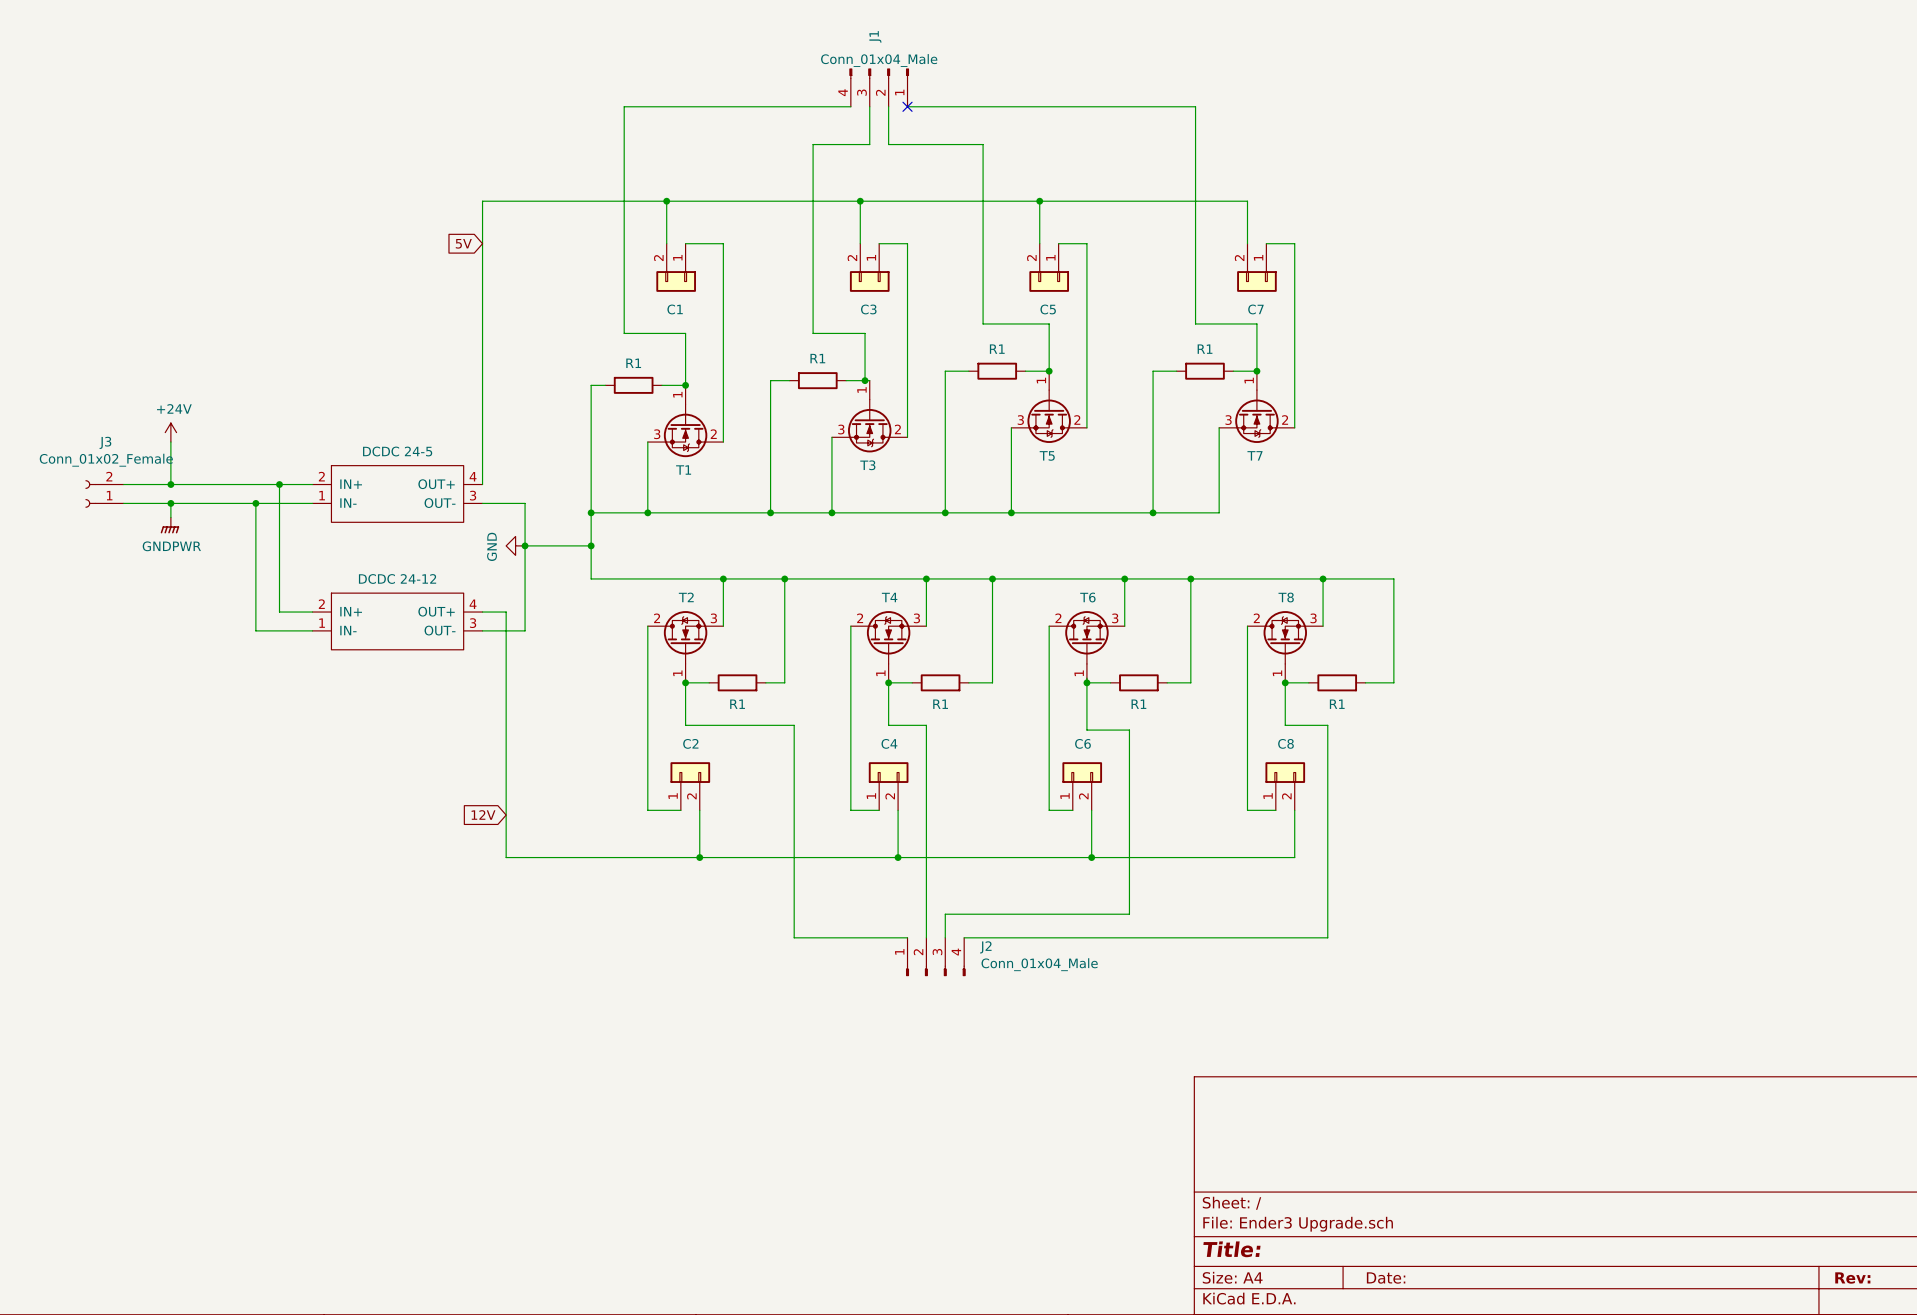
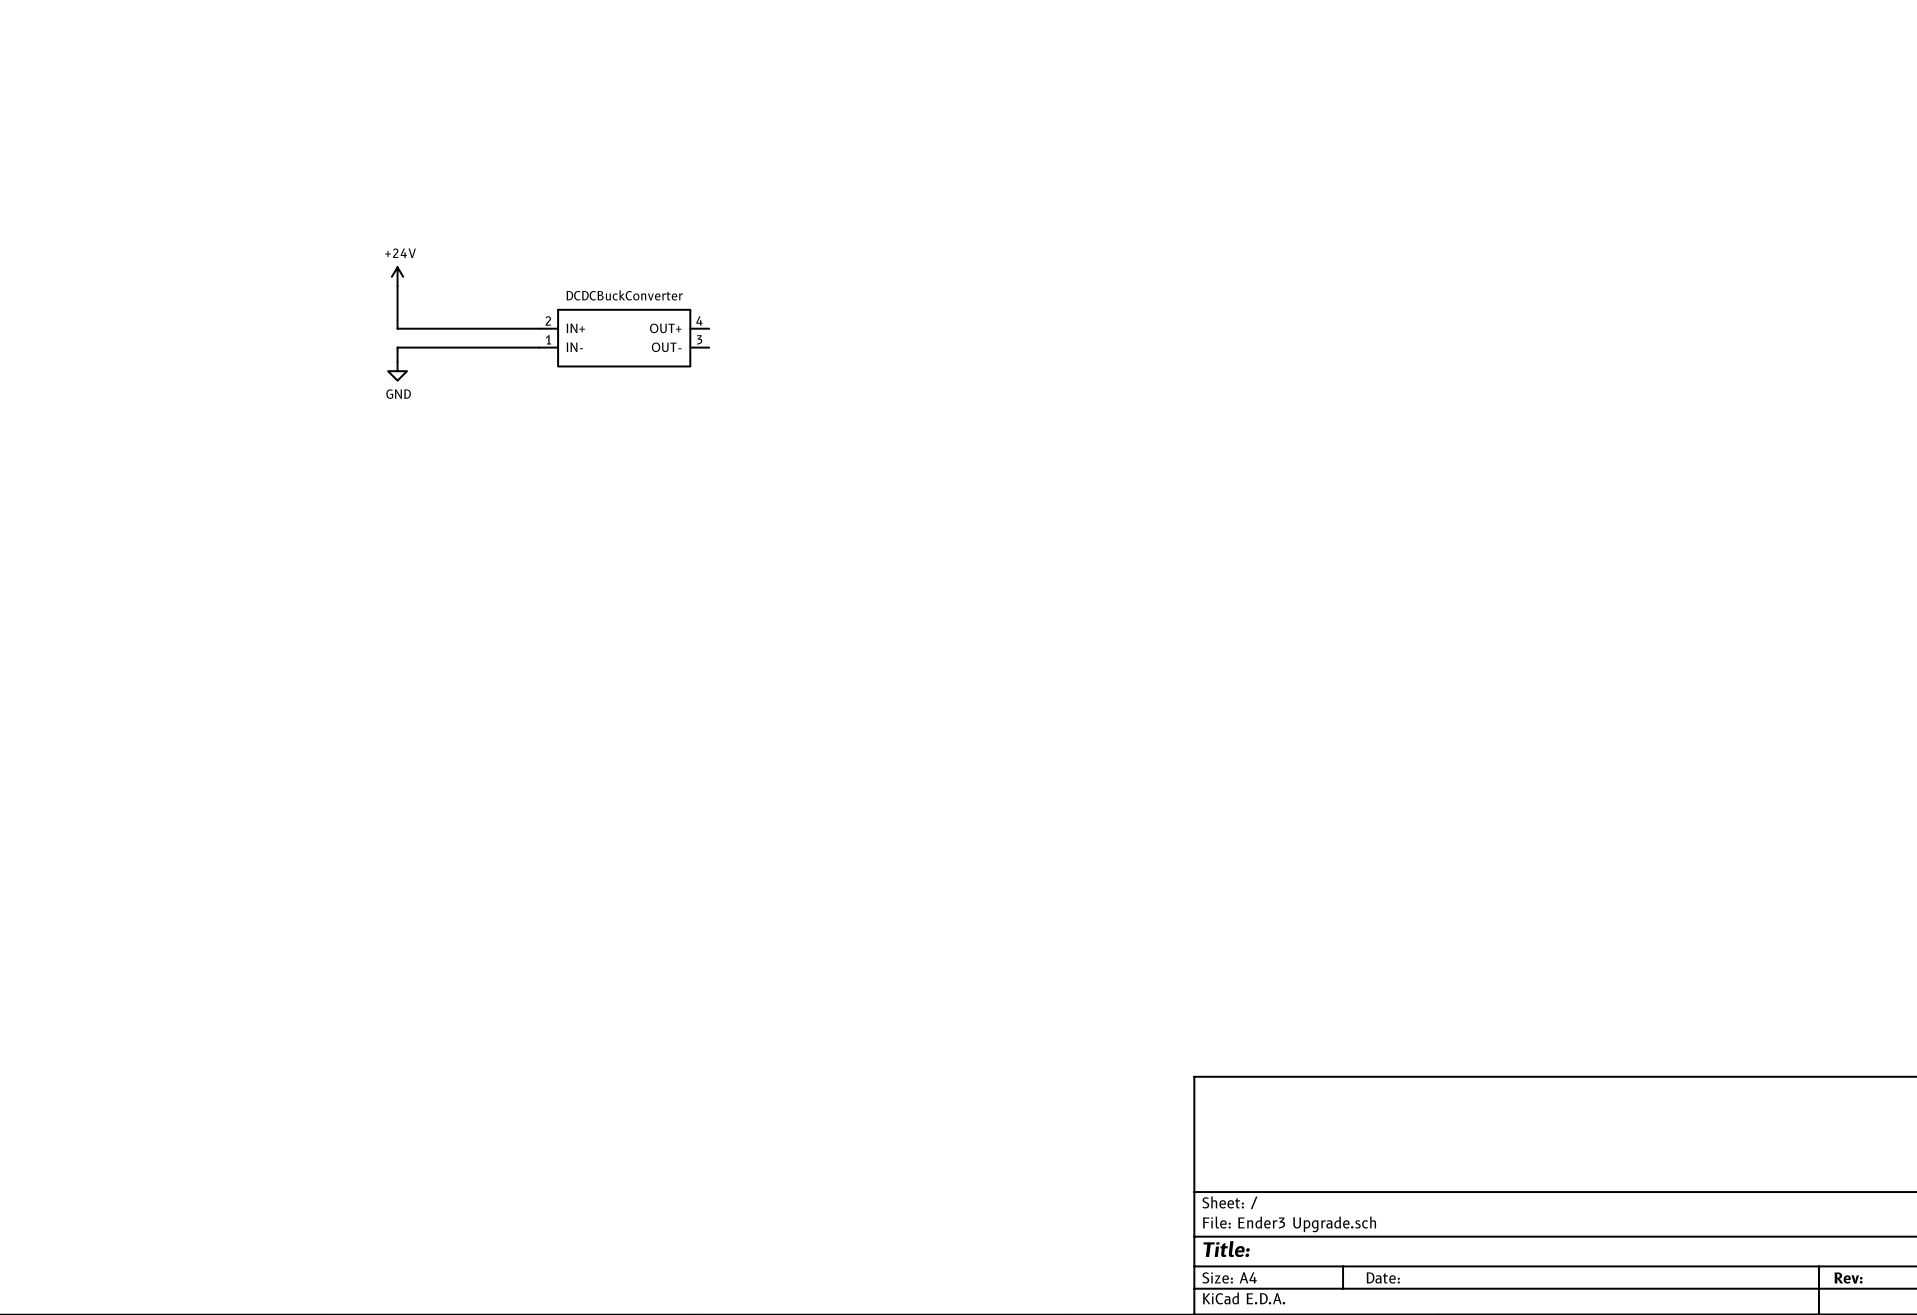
J1: Conn_01x04_Male (879, 87) -> none
wire: (850, 106) (624, 106) (624, 333) (685, 333) (685, 385) (661, 385) -> none
wire: (869, 106) (869, 144) (813, 144) (813, 333) (865, 333) (865, 380) -> none
wire: (888, 106) (888, 144) (983, 144) (983, 323) (1049, 323) (1049, 371) (1025, 371) -> none
wire: (907, 106) (1195, 106) (1195, 323) (1256, 323) (1256, 371) (1233, 371) -> none
no-connect mark: (907, 106) -> none
wire: (666, 201) (666, 243) -> none
junction: (666, 201) -> none
wire: (860, 201) (860, 243) -> none
junction: (860, 201) -> none
wire: (1039, 201) (1039, 243) -> none
junction: (1039, 201) -> none
global label: 5V (463, 243) -> none
wire: (685, 243) (723, 243) (723, 442) -> none
wire: (879, 243) (907, 243) (907, 437) -> none
wire: (1058, 243) (1086, 243) (1086, 427) -> none
wire: (1247, 243) (1247, 201) (482, 201) (482, 484) -> none
wire: (1266, 243) (1294, 243) (1294, 427) -> none
C1: (676, 267) -> none
C3: (869, 267) -> none
C5: (1049, 267) -> none
C7: (1256, 267) -> none
power symbol: none -> +24V (397, 276)
wire: none -> (397, 286) (397, 328) (539, 328)
part: none -> DCDCBuckConverter (624, 338)
wire: none -> (539, 347) (397, 347) (397, 361)
power symbol: none -> GND (397, 371)
wire: (968, 371) (945, 371) (945, 512) -> none
part: R1 (997, 371) -> none
junction: (1049, 371) -> none
wire: (1176, 371) (1153, 371) (1153, 512) -> none
part: R1 (1204, 371) -> none
junction: (1256, 371) -> none
wire: (789, 380) (770, 380) (770, 512) -> none
part: R1 (817, 380) -> none
wire: (846, 380) (869, 380) -> none
junction: (865, 380) -> none
wire: (605, 385) (591, 385) (591, 578) (1393, 578) (1393, 682) (1365, 682) -> none
part: R1 (633, 385) -> none
junction: (685, 385) -> none
T5: (1049, 407) -> none
T7: (1256, 407) -> none
T3: (869, 416) -> none
T1: (685, 421) -> none
wire: (1011, 427) (1011, 512) -> none
wire: (1219, 427) (1219, 512) (591, 512) -> none
power symbol: +24V (170, 432) -> none
wire: (831, 437) (831, 512) -> none
wire: (170, 442) (170, 484) -> none
wire: (647, 442) (647, 512) -> none
wire: (123, 484) (312, 484) -> none
junction: (170, 484) -> none
wire: (279, 484) (279, 612) (312, 612) -> none
junction: (279, 484) -> none
J3: Conn_01x02_Female (104, 493) -> none
part: DCDC 24-5 (397, 493) -> none
wire: (123, 503) (312, 503) -> none
wire: (170, 503) (170, 517) -> none
junction: (170, 503) -> none
wire: (255, 503) (255, 630) (312, 630) -> none
junction: (255, 503) -> none
wire: (482, 503) (525, 503) (525, 630) (482, 630) -> none
junction: (591, 512) -> none
junction: (647, 512) -> none
junction: (770, 512) -> none
junction: (831, 512) -> none
junction: (945, 512) -> none
junction: (1011, 512) -> none
junction: (1153, 512) -> none
power symbol: GNDPWR (169, 525) -> none
power symbol: GND (515, 545) -> none
wire: (525, 545) (591, 545) -> none
junction: (525, 545) -> none
junction: (591, 545) -> none
wire: (723, 578) (723, 626) -> none
junction: (723, 578) -> none
wire: (784, 578) (784, 682) (765, 682) -> none
junction: (784, 578) -> none
wire: (926, 578) (926, 626) -> none
junction: (926, 578) -> none
wire: (992, 578) (992, 682) (968, 682) -> none
junction: (992, 578) -> none
wire: (1124, 578) (1124, 626) -> none
junction: (1124, 578) -> none
wire: (1190, 578) (1190, 682) (1167, 682) -> none
junction: (1190, 578) -> none
wire: (1323, 578) (1323, 626) -> none
junction: (1323, 578) -> none
wire: (482, 612) (506, 612) (506, 857) (1294, 857) (1294, 810) -> none
part: DCDC 24-12 (397, 621) -> none
wire: (647, 626) (647, 810) (680, 810) -> none
wire: (850, 626) (850, 810) (879, 810) -> none
wire: (1049, 626) (1049, 810) (1072, 810) -> none
wire: (1247, 626) (1247, 810) (1275, 810) -> none
T2: (685, 646) -> none
T4: (888, 646) -> none
T6: (1086, 646) -> none
T8: (1285, 646) -> none
wire: (1086, 678) (1086, 730) (1129, 730) (1129, 914) (945, 914) (945, 937) -> none
junction: (685, 682) -> none
wire: (709, 682) (685, 682) (685, 725) (794, 725) (794, 937) (907, 937) -> none
part: R1 (737, 682) -> none
junction: (888, 682) -> none
wire: (912, 682) (888, 682) (888, 725) (926, 725) (926, 937) -> none
part: R1 (940, 682) -> none
wire: (1086, 682) (1110, 682) -> none
junction: (1086, 682) -> none
part: R1 (1138, 682) -> none
junction: (1285, 682) -> none
wire: (1308, 682) (1285, 682) (1285, 725) (1327, 725) (1327, 937) (964, 937) -> none
part: R1 (1337, 682) -> none
C2: (690, 786) -> none
C4: (888, 786) -> none
C6: (1082, 786) -> none
C8: (1285, 786) -> none
wire: (699, 810) (699, 857) -> none
wire: (898, 810) (898, 857) -> none
wire: (1091, 810) (1091, 857) -> none
global label: 12V (483, 814) -> none
junction: (699, 857) -> none
junction: (898, 857) -> none
junction: (1091, 857) -> none
J2: Conn_01x04_Male (935, 957) -> none

